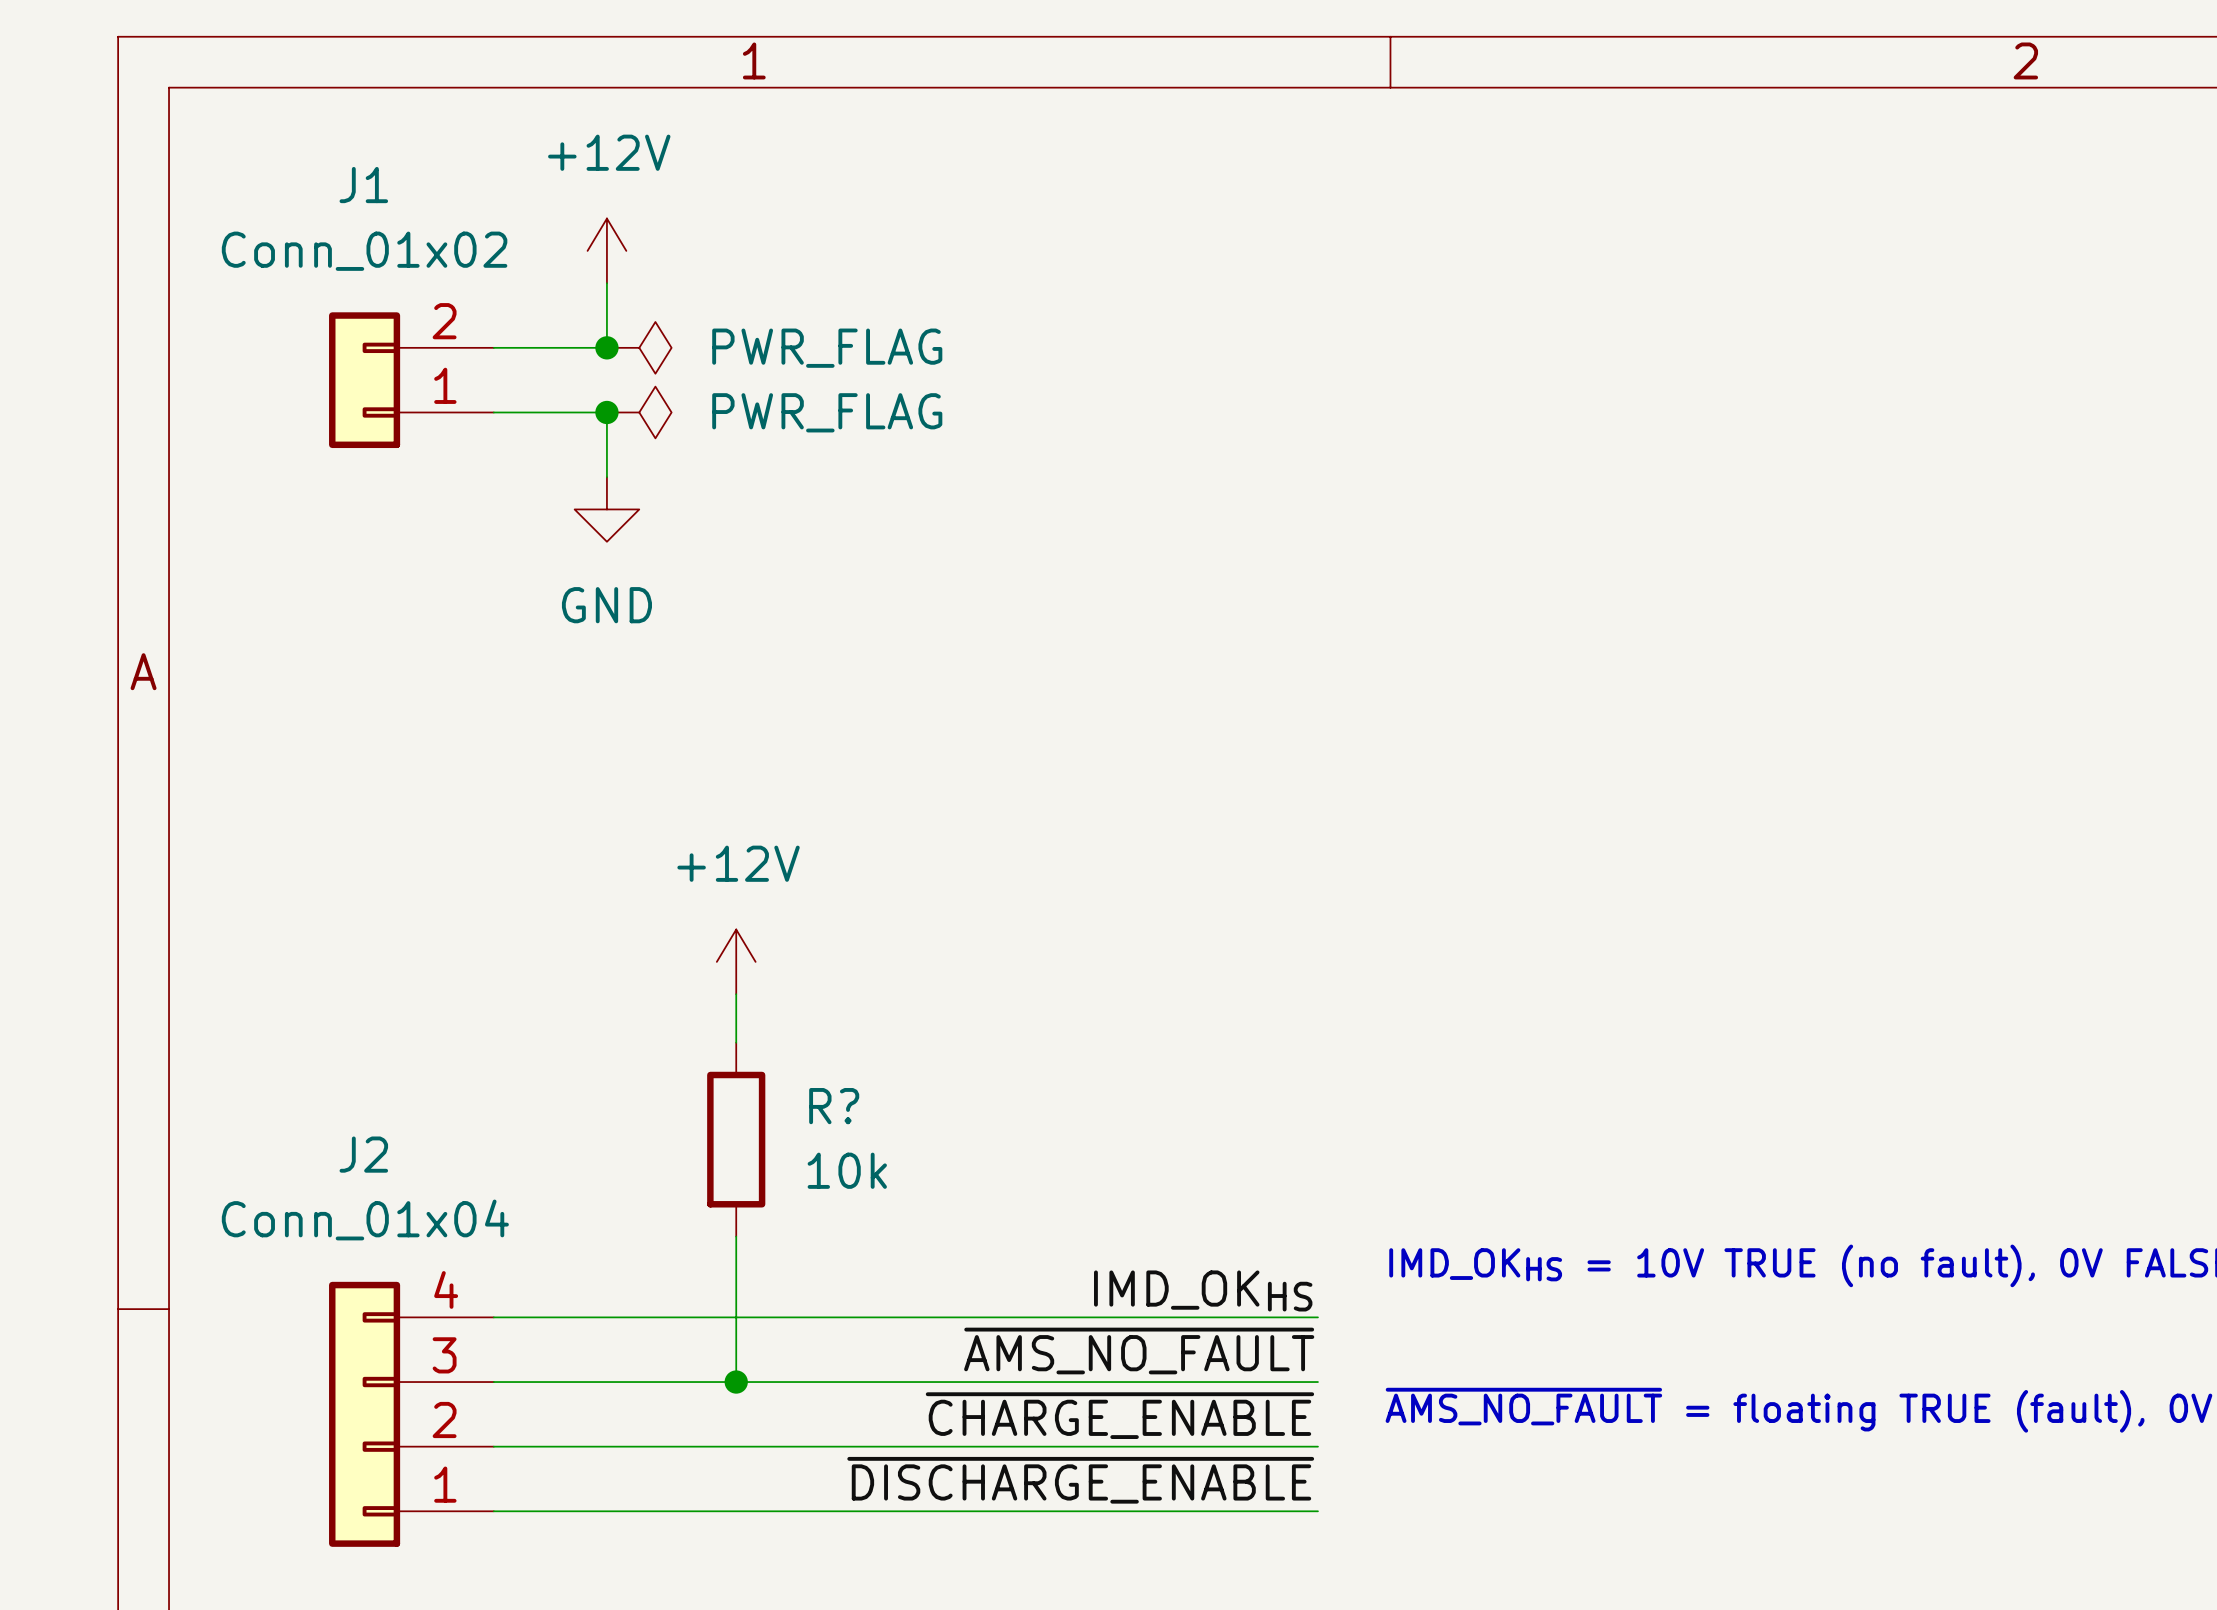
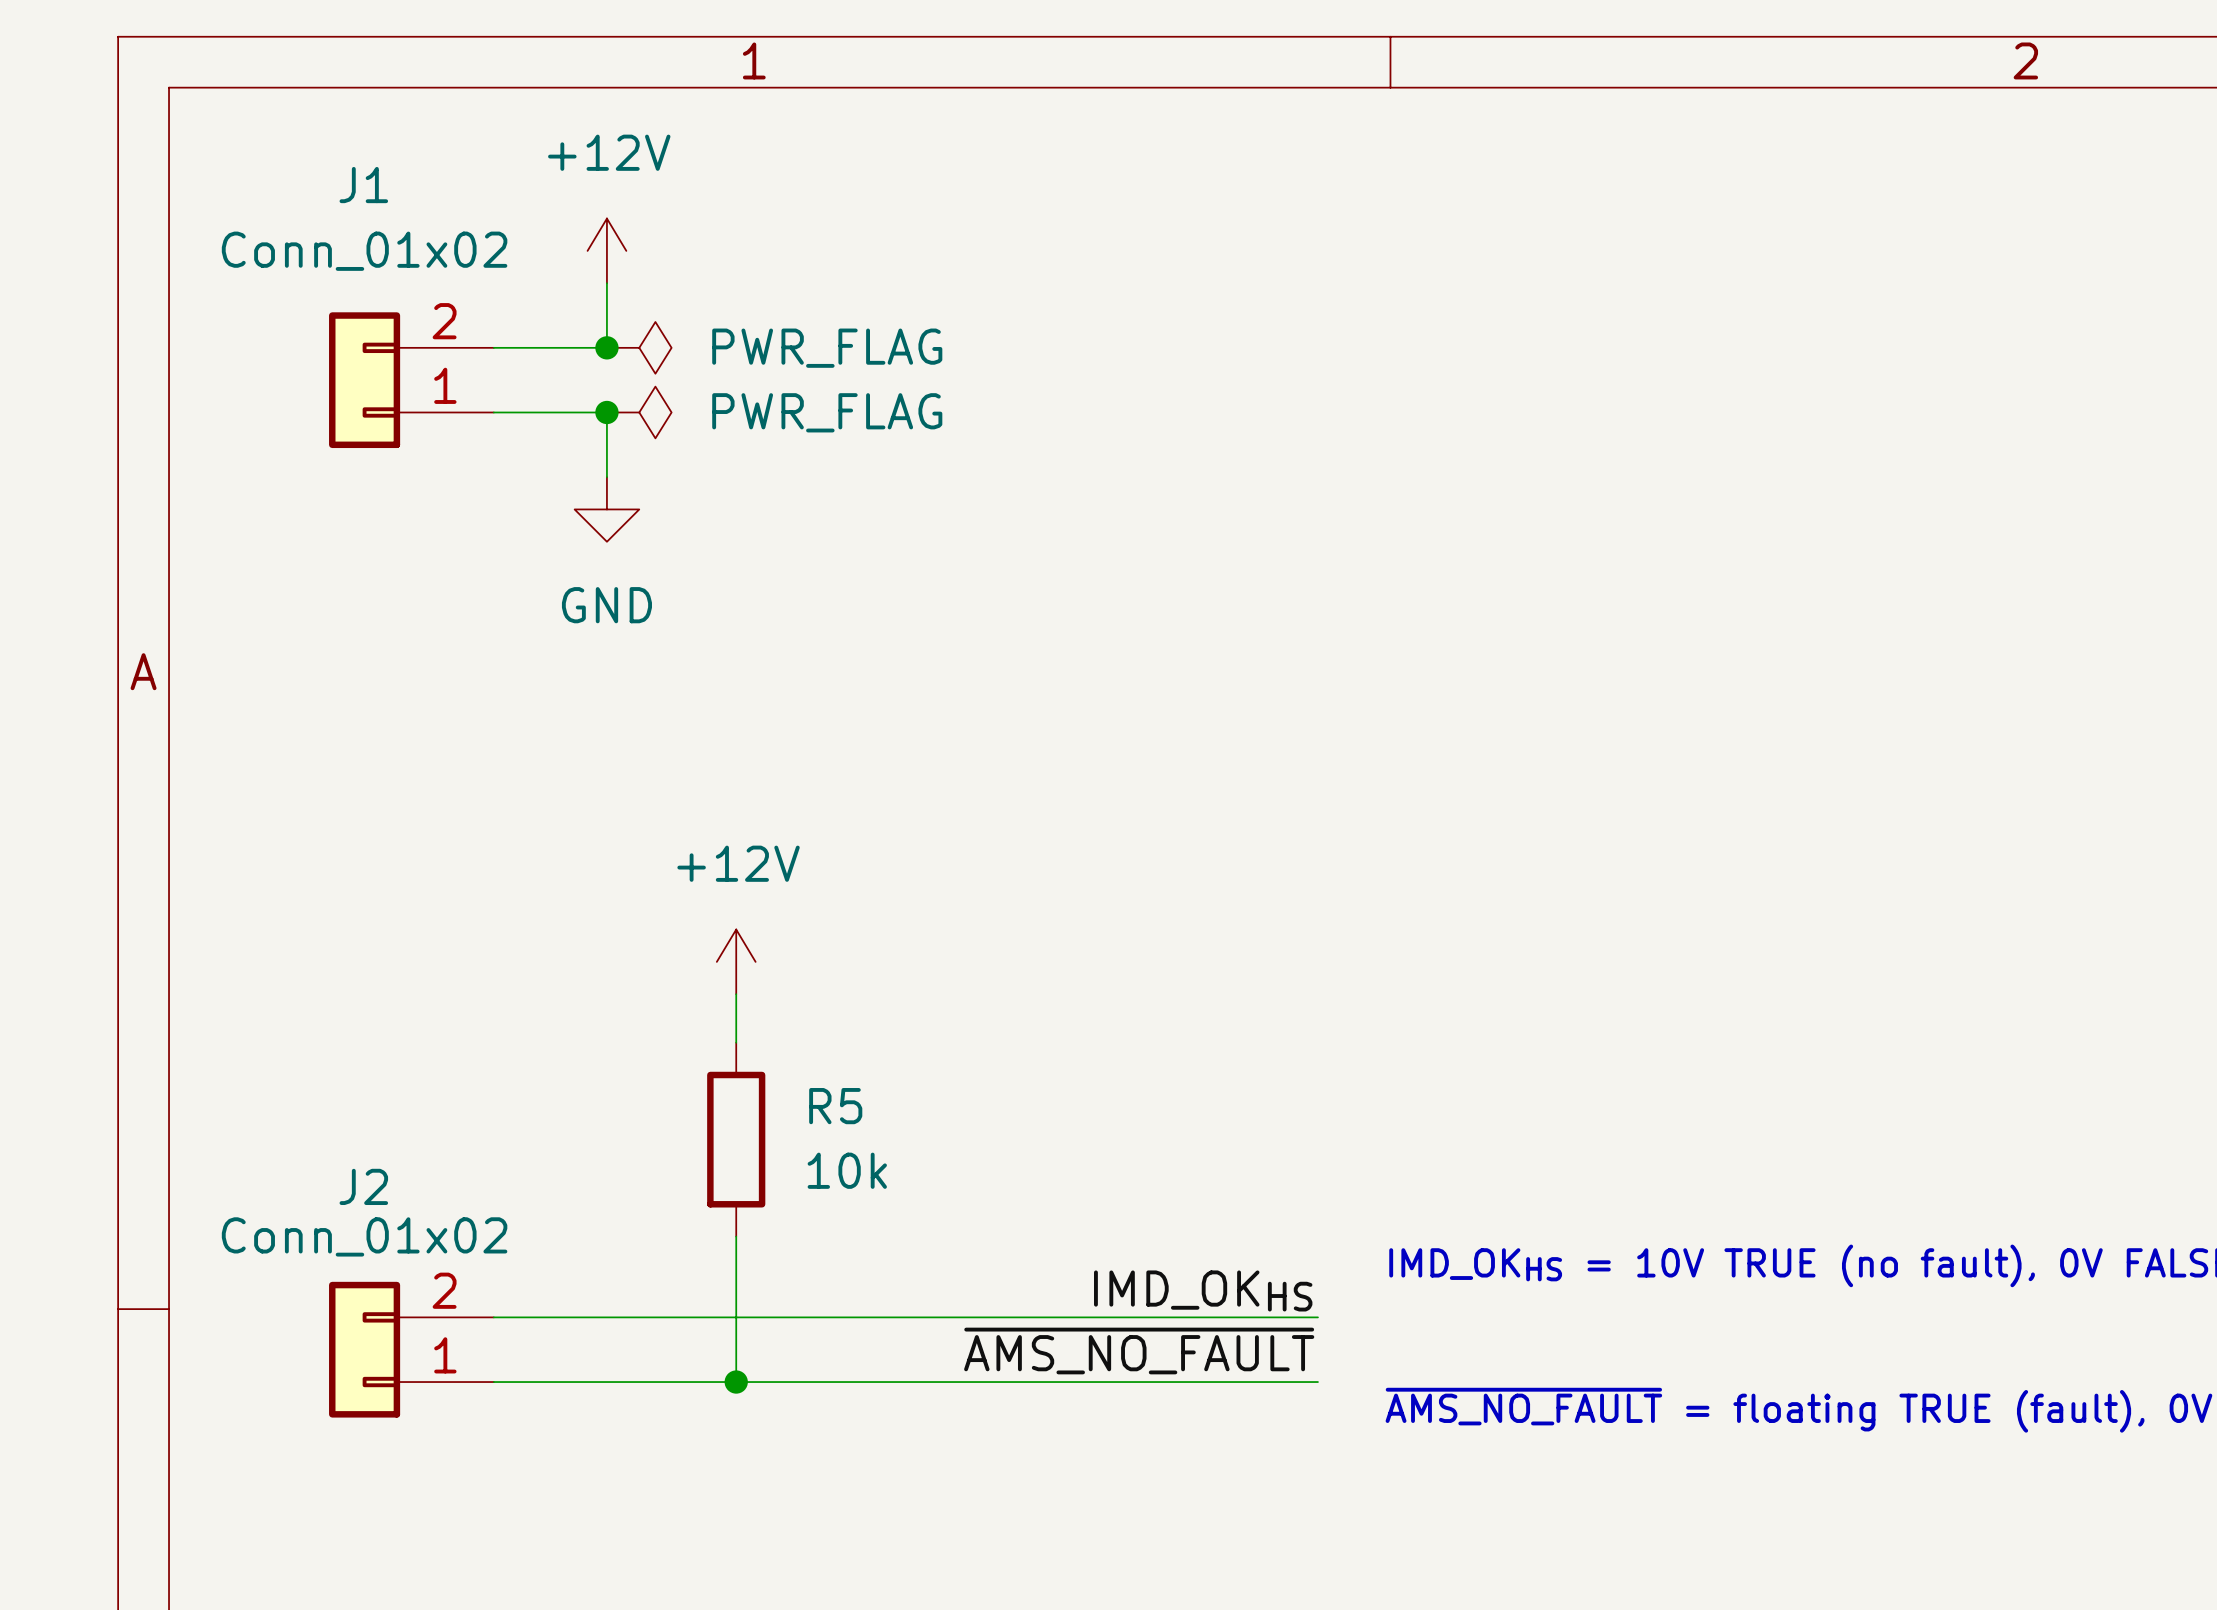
R? name: R? (834, 1106) -> R5 (835, 1106)
J2 name position: J2 (363, 1154) -> J2 (363, 1186)
J2 value: Conn_01x04 (365, 1219) -> Conn_01x02 (364, 1236)
J2 symbol: [329, 1281, 494, 1547] -> [329, 1281, 494, 1418]
label: ~{CHARGE_ENABLE} (1119, 1415) -> none
wire: (493, 1446) (1317, 1446) -> none
label: ~{DISCHARGE_ENABLE} (1080, 1480) -> none
wire: (493, 1511) (1317, 1511) -> none

